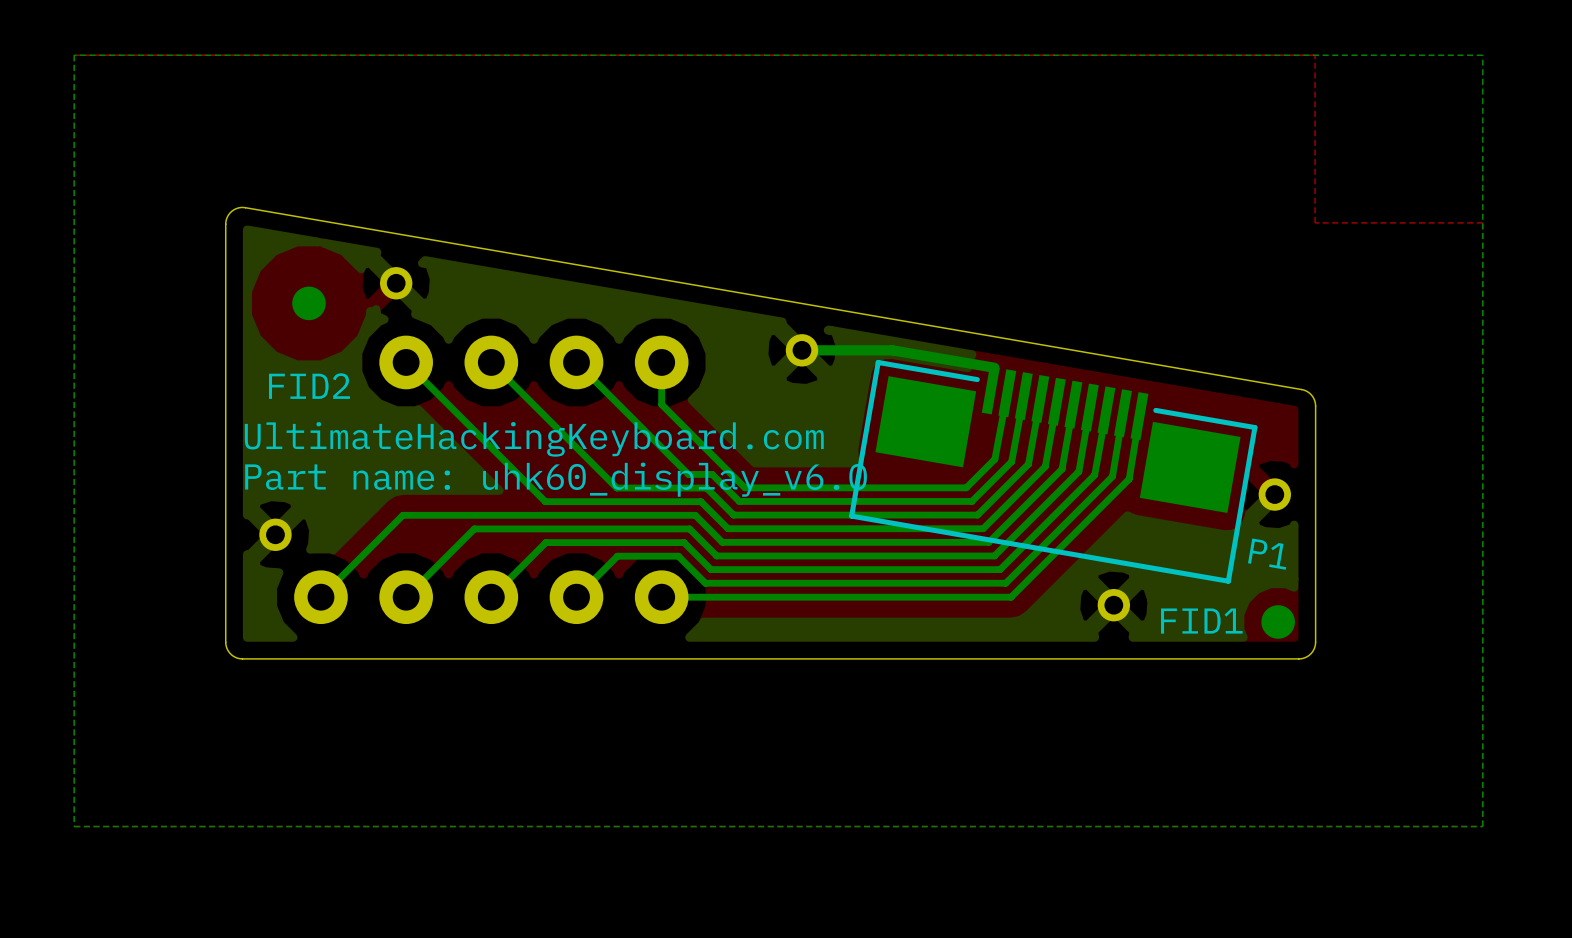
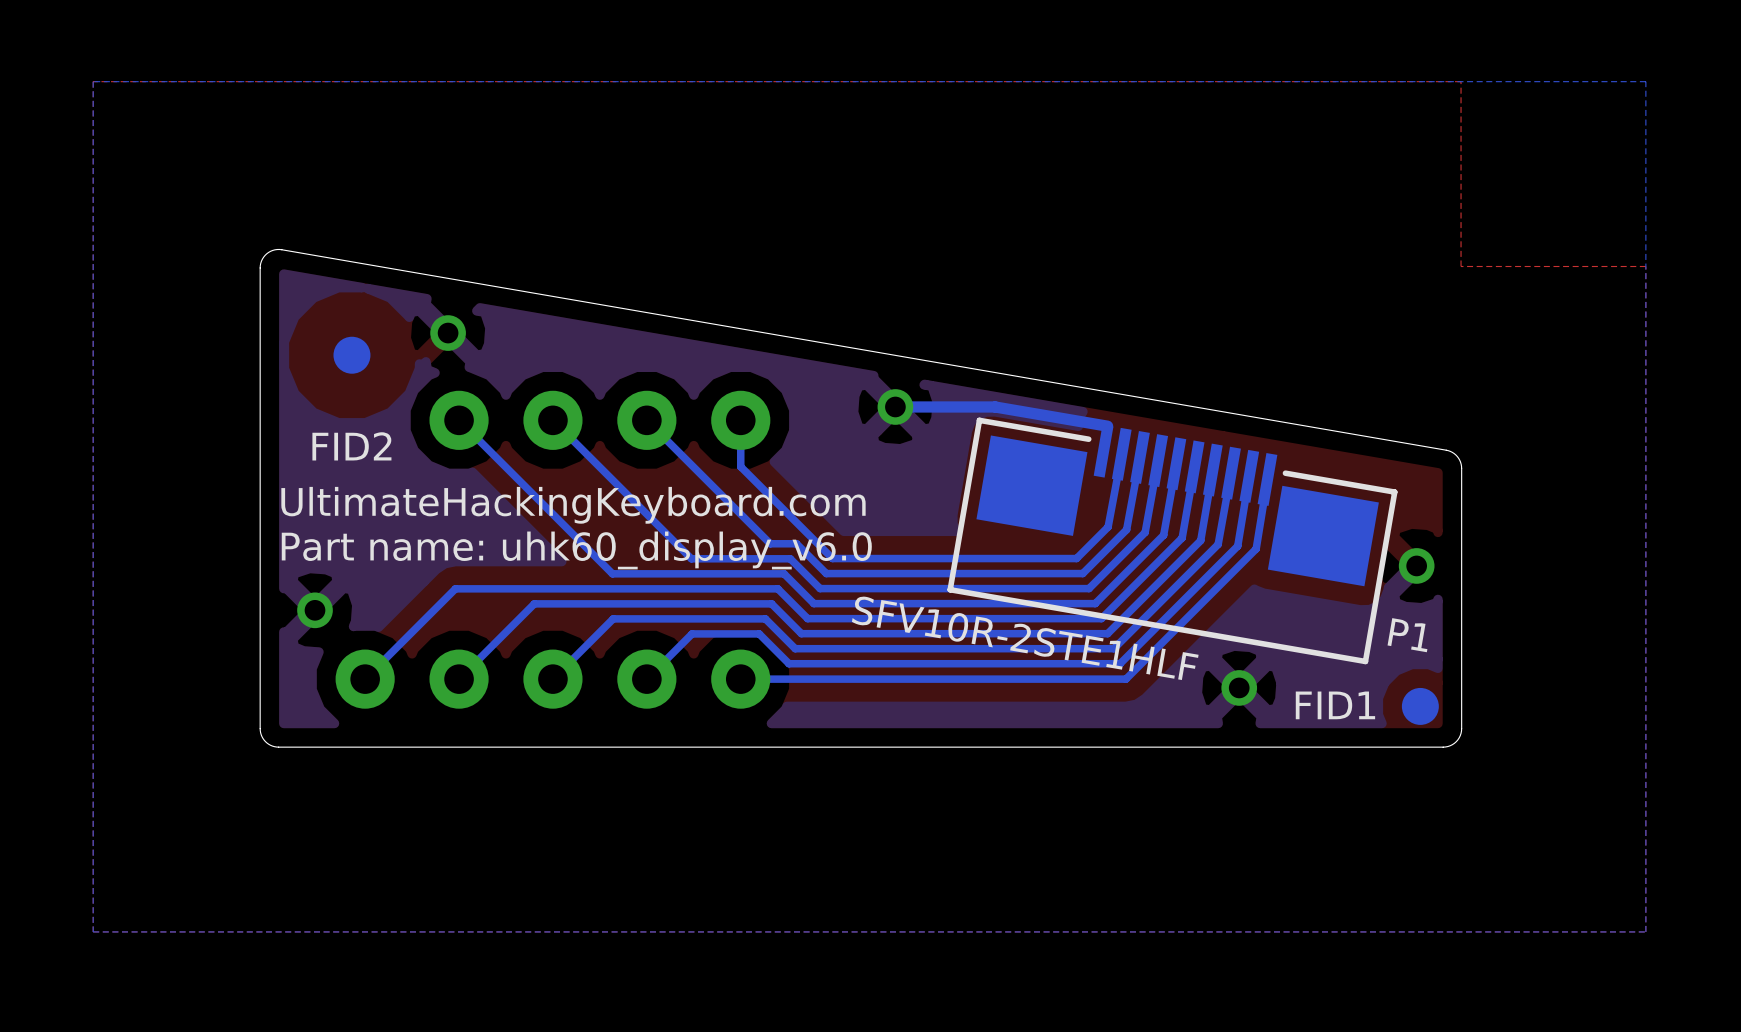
P1 name rotation: 0° (1267, 554) -> 0° clockwise (1407, 635)
P1 value: none -> SFV10R-2STE1HLF (1025, 638)

